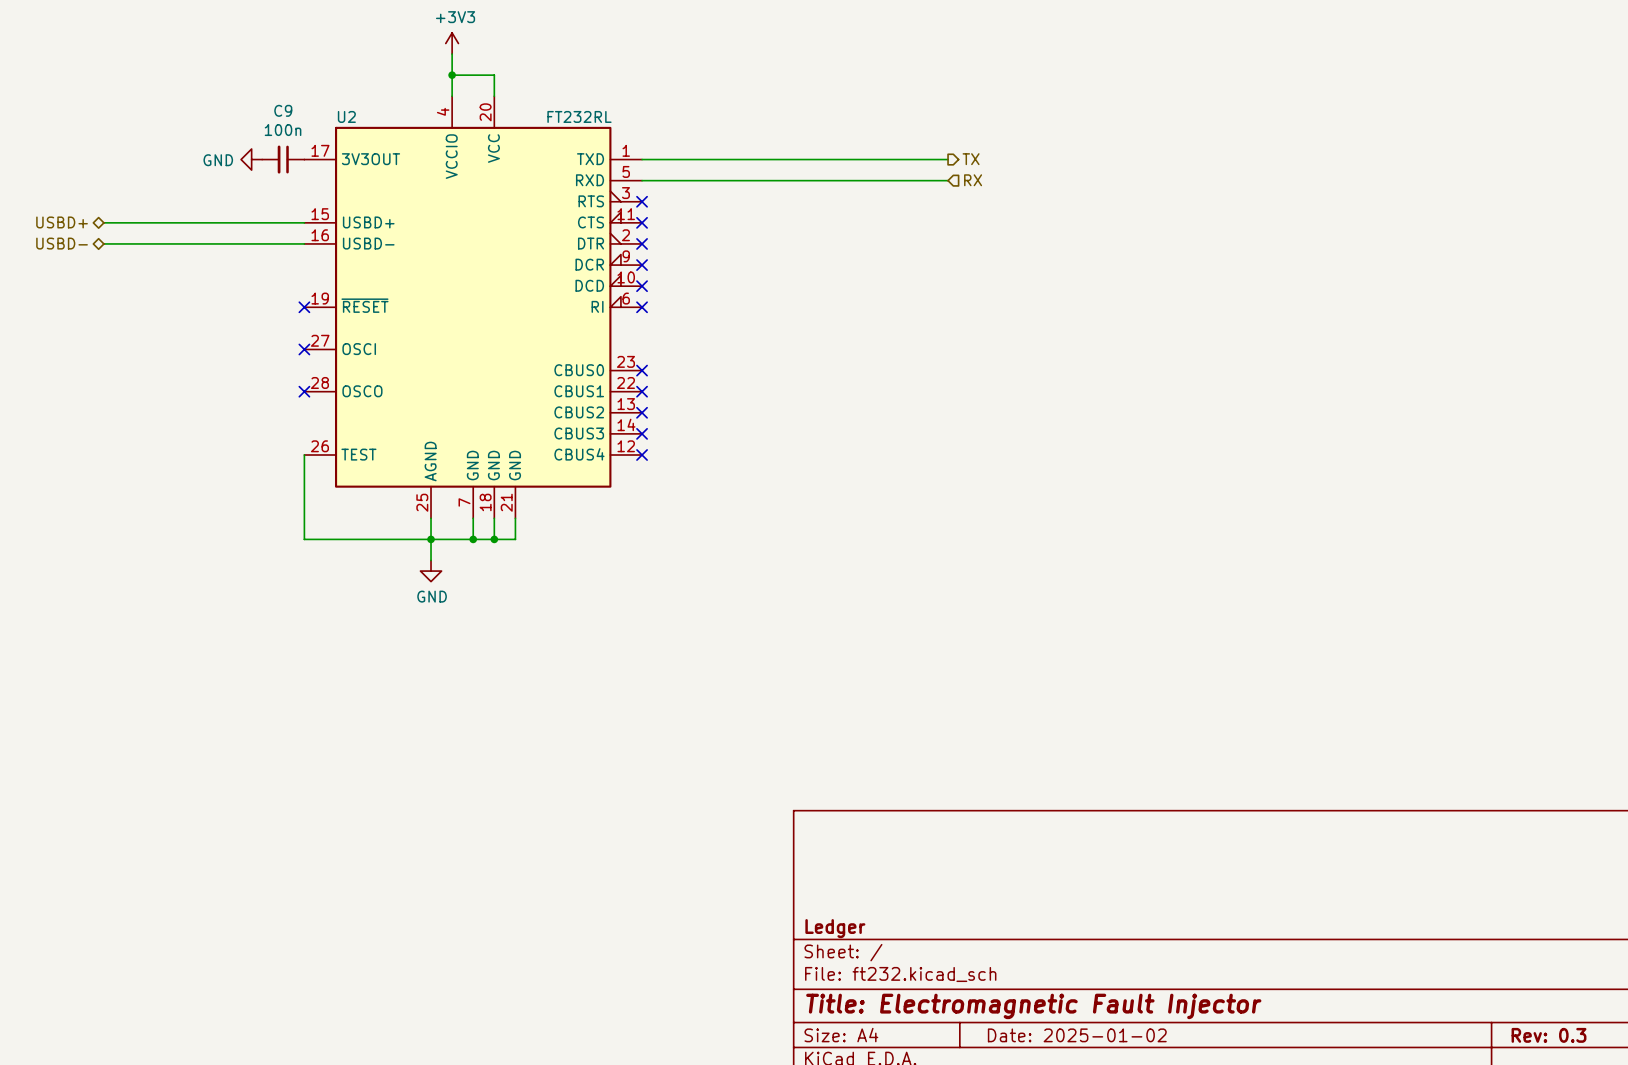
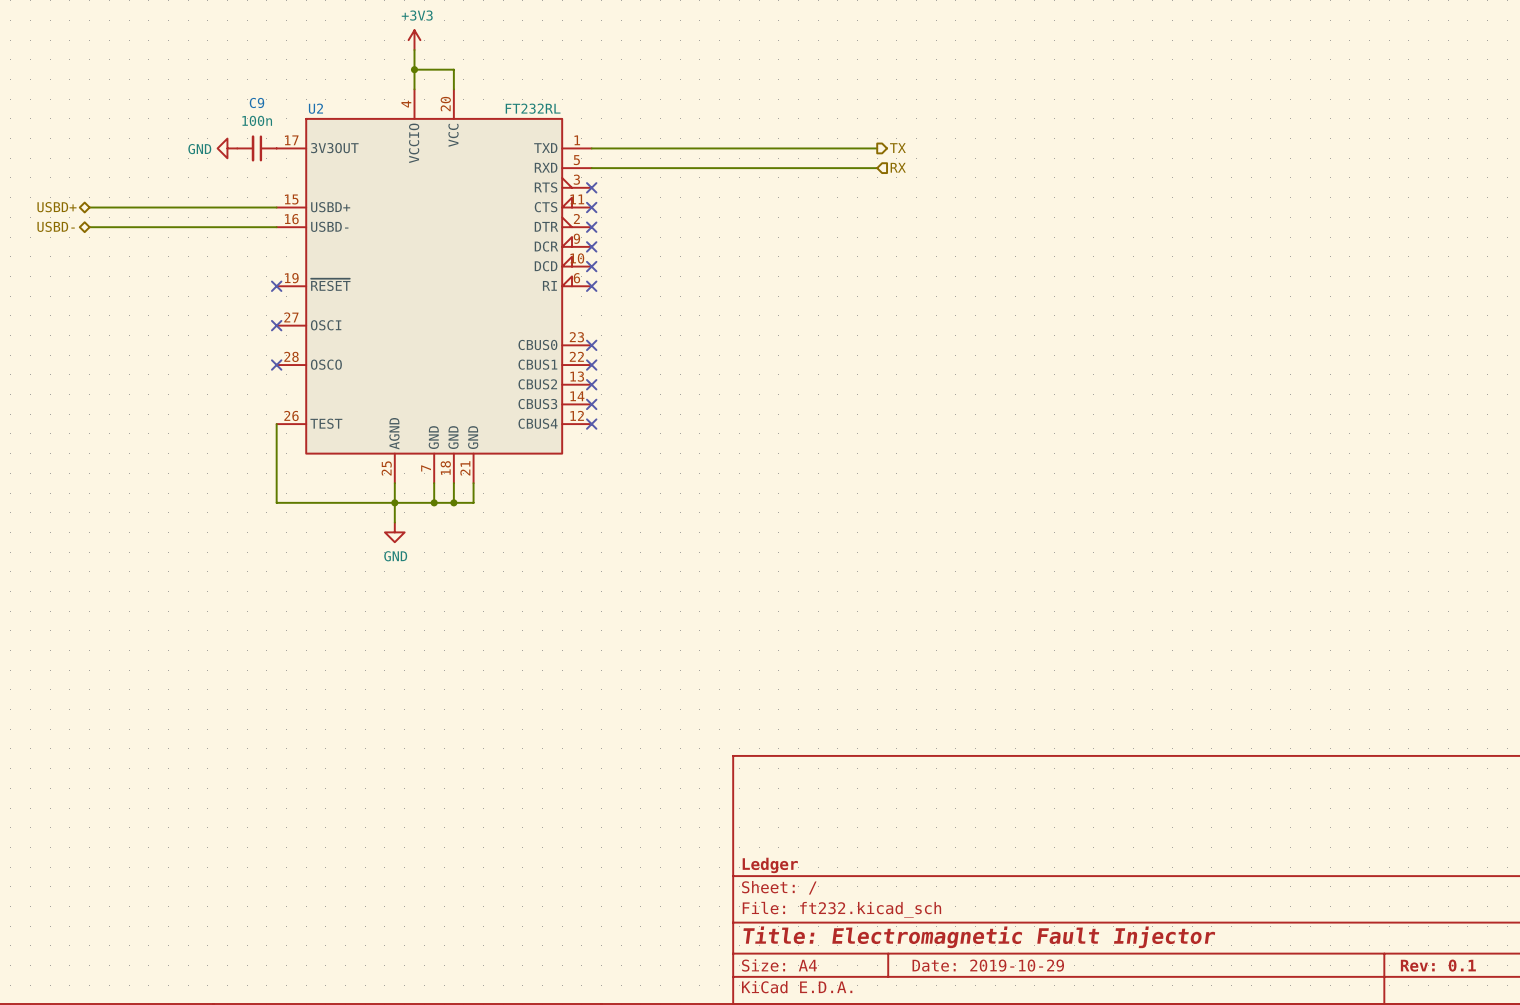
title block: Date: 2025-01-02 (1077, 1035) -> Date: 2019-10-29 (988, 965)
title block: Rev: 0.3 (1549, 1035) -> Rev: 0.1 (1438, 965)

